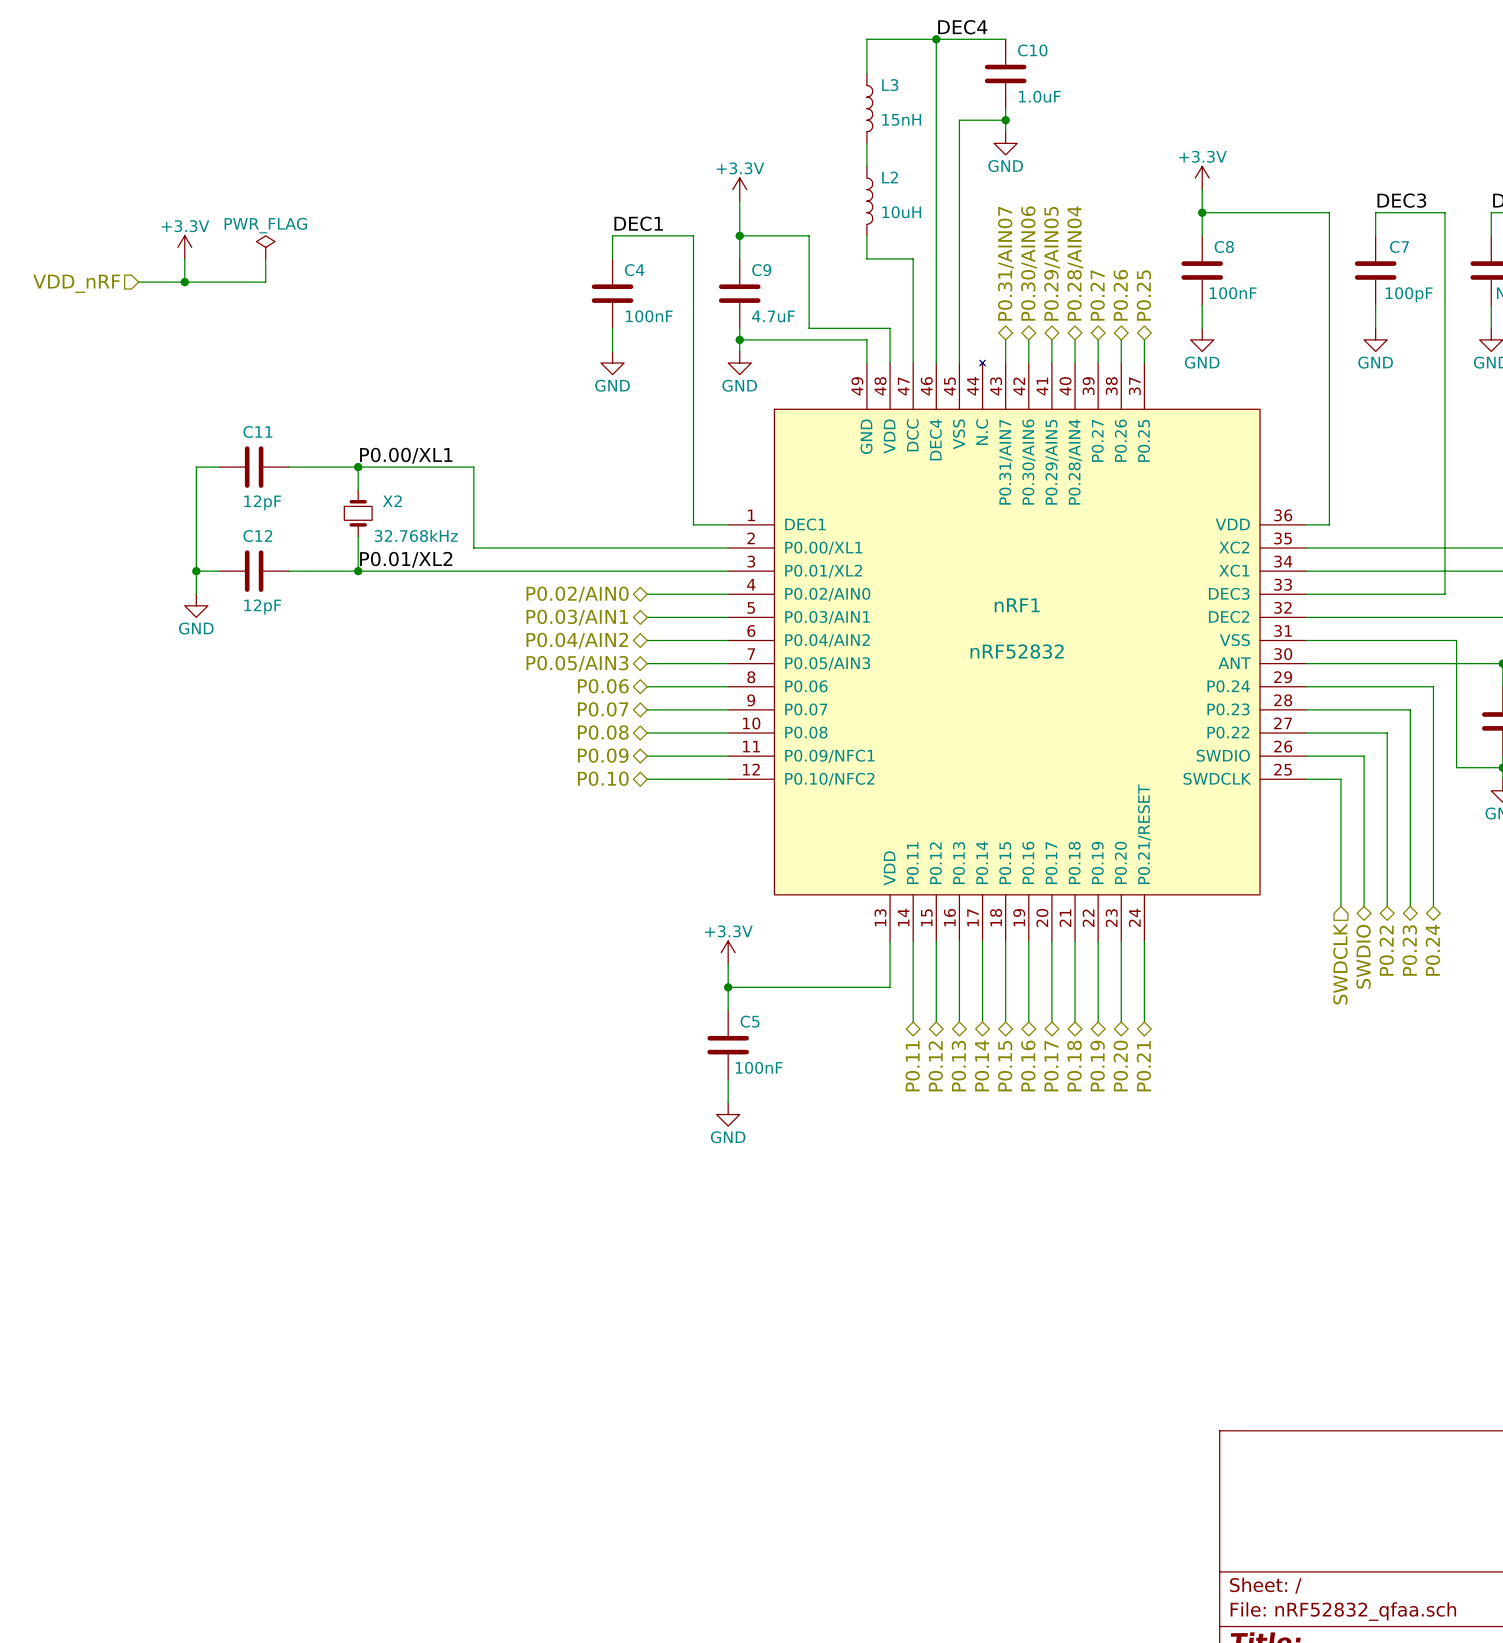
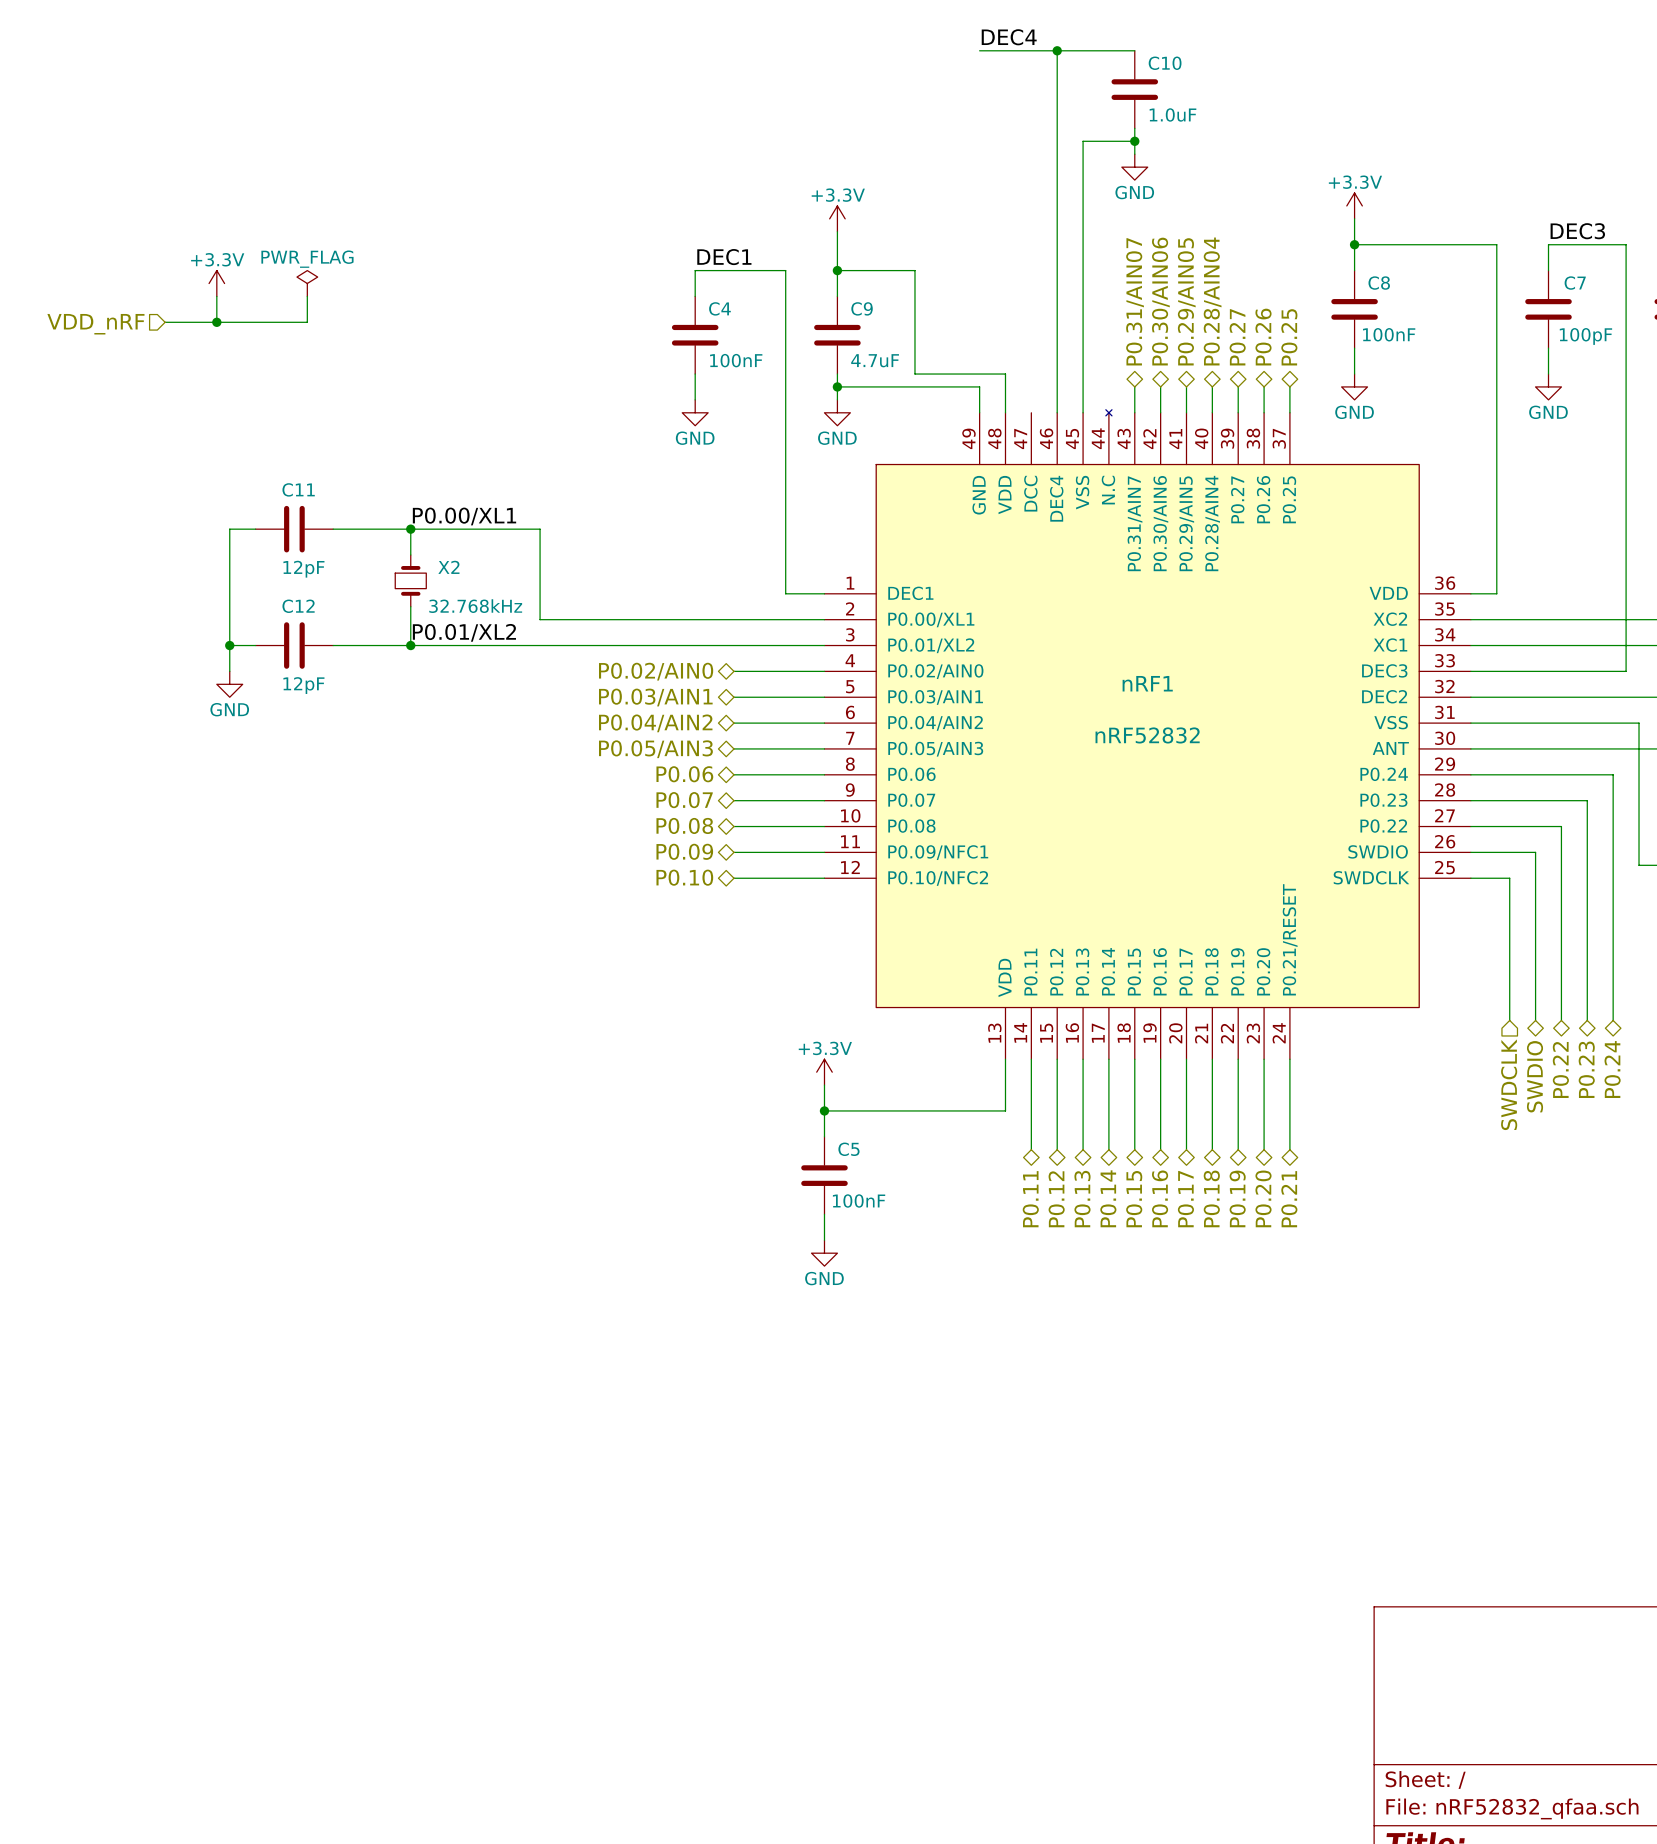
label position: DEC4 (962, 27) -> DEC4 (1009, 37)
wire: (866, 39) (866, 73) -> none
L3: 15nH (869, 108) -> none
wire: (866, 143) (866, 166) -> none
L2: 10uH (869, 201) -> none
wire: (866, 235) (866, 258) (913, 258) (913, 363) -> none

